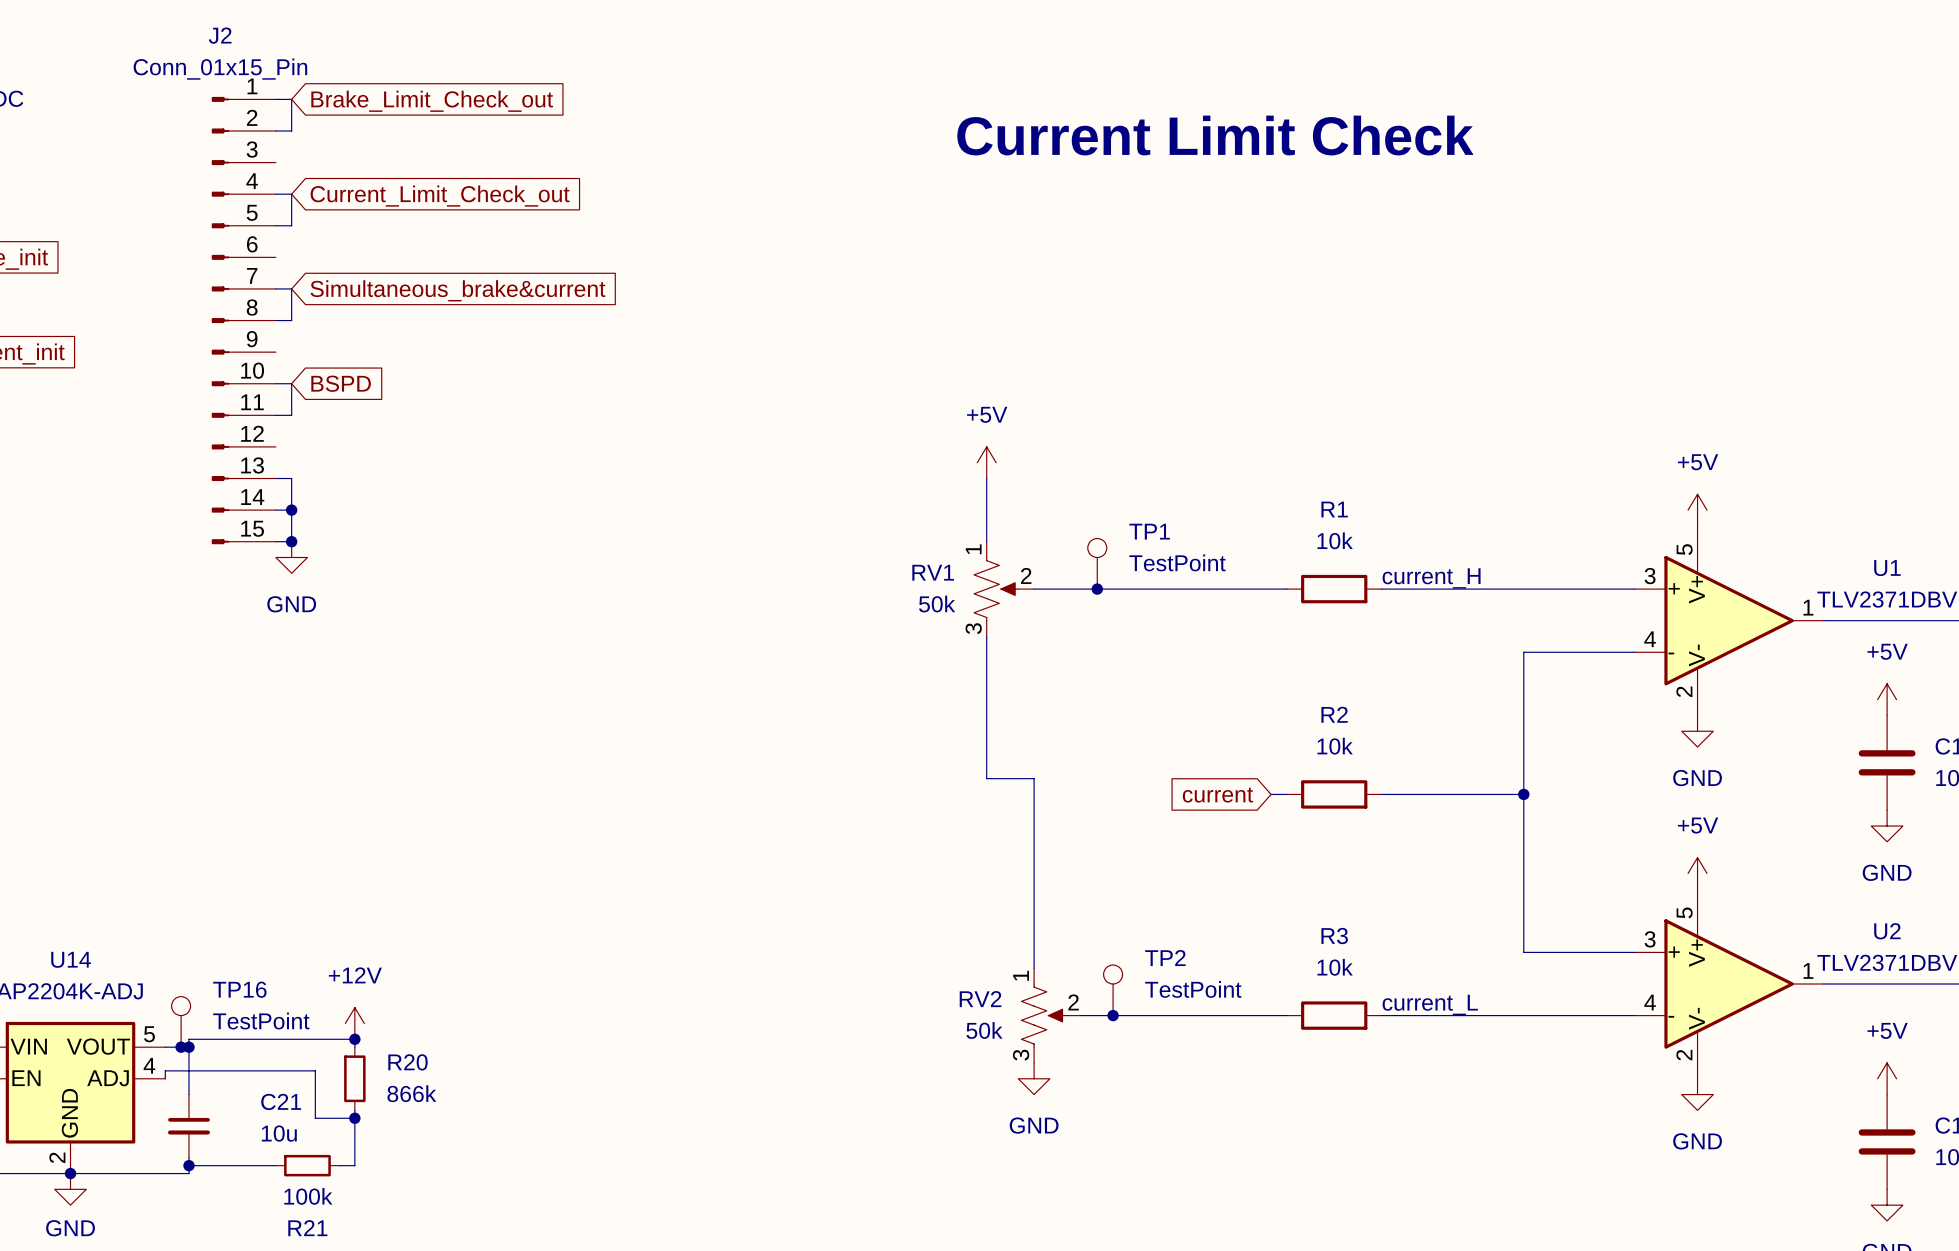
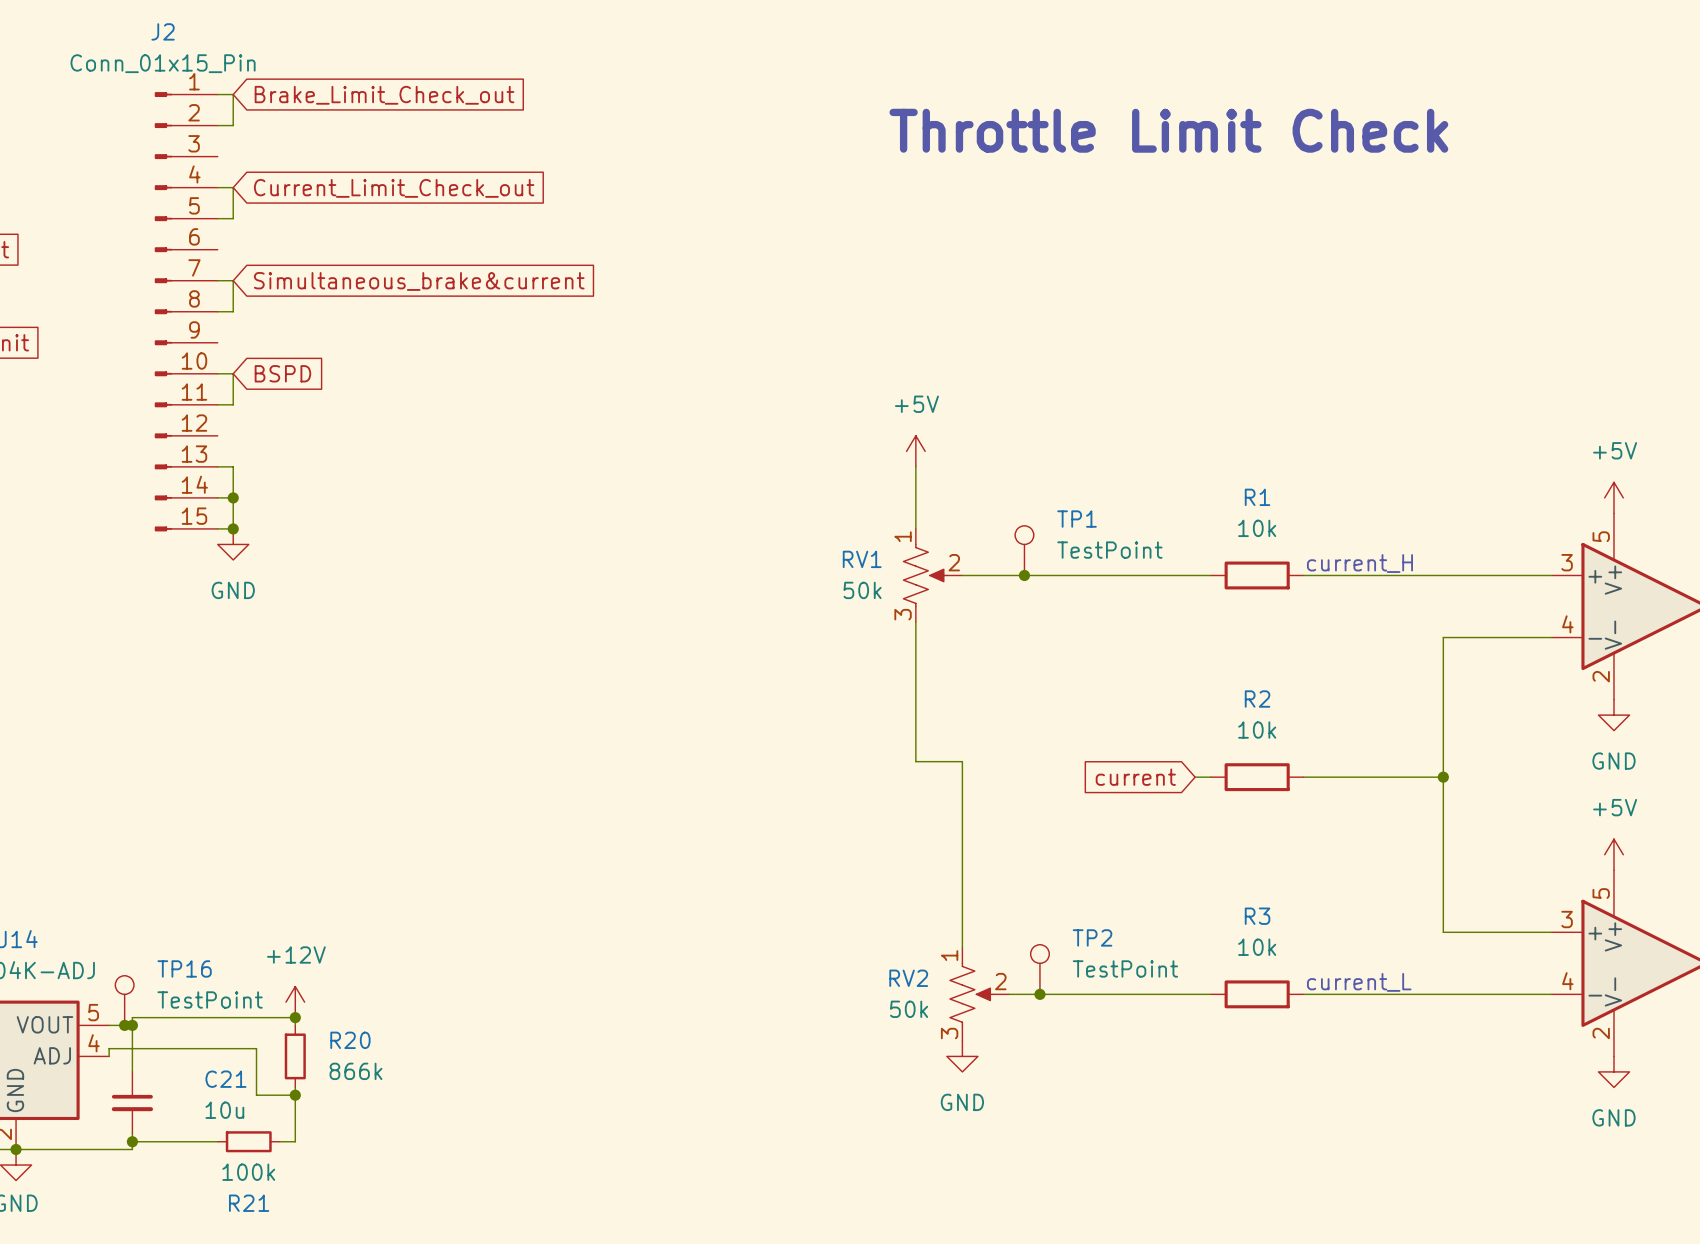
text: Current Limit Check (1215, 135) -> Throttle Limit Check (1168, 130)

